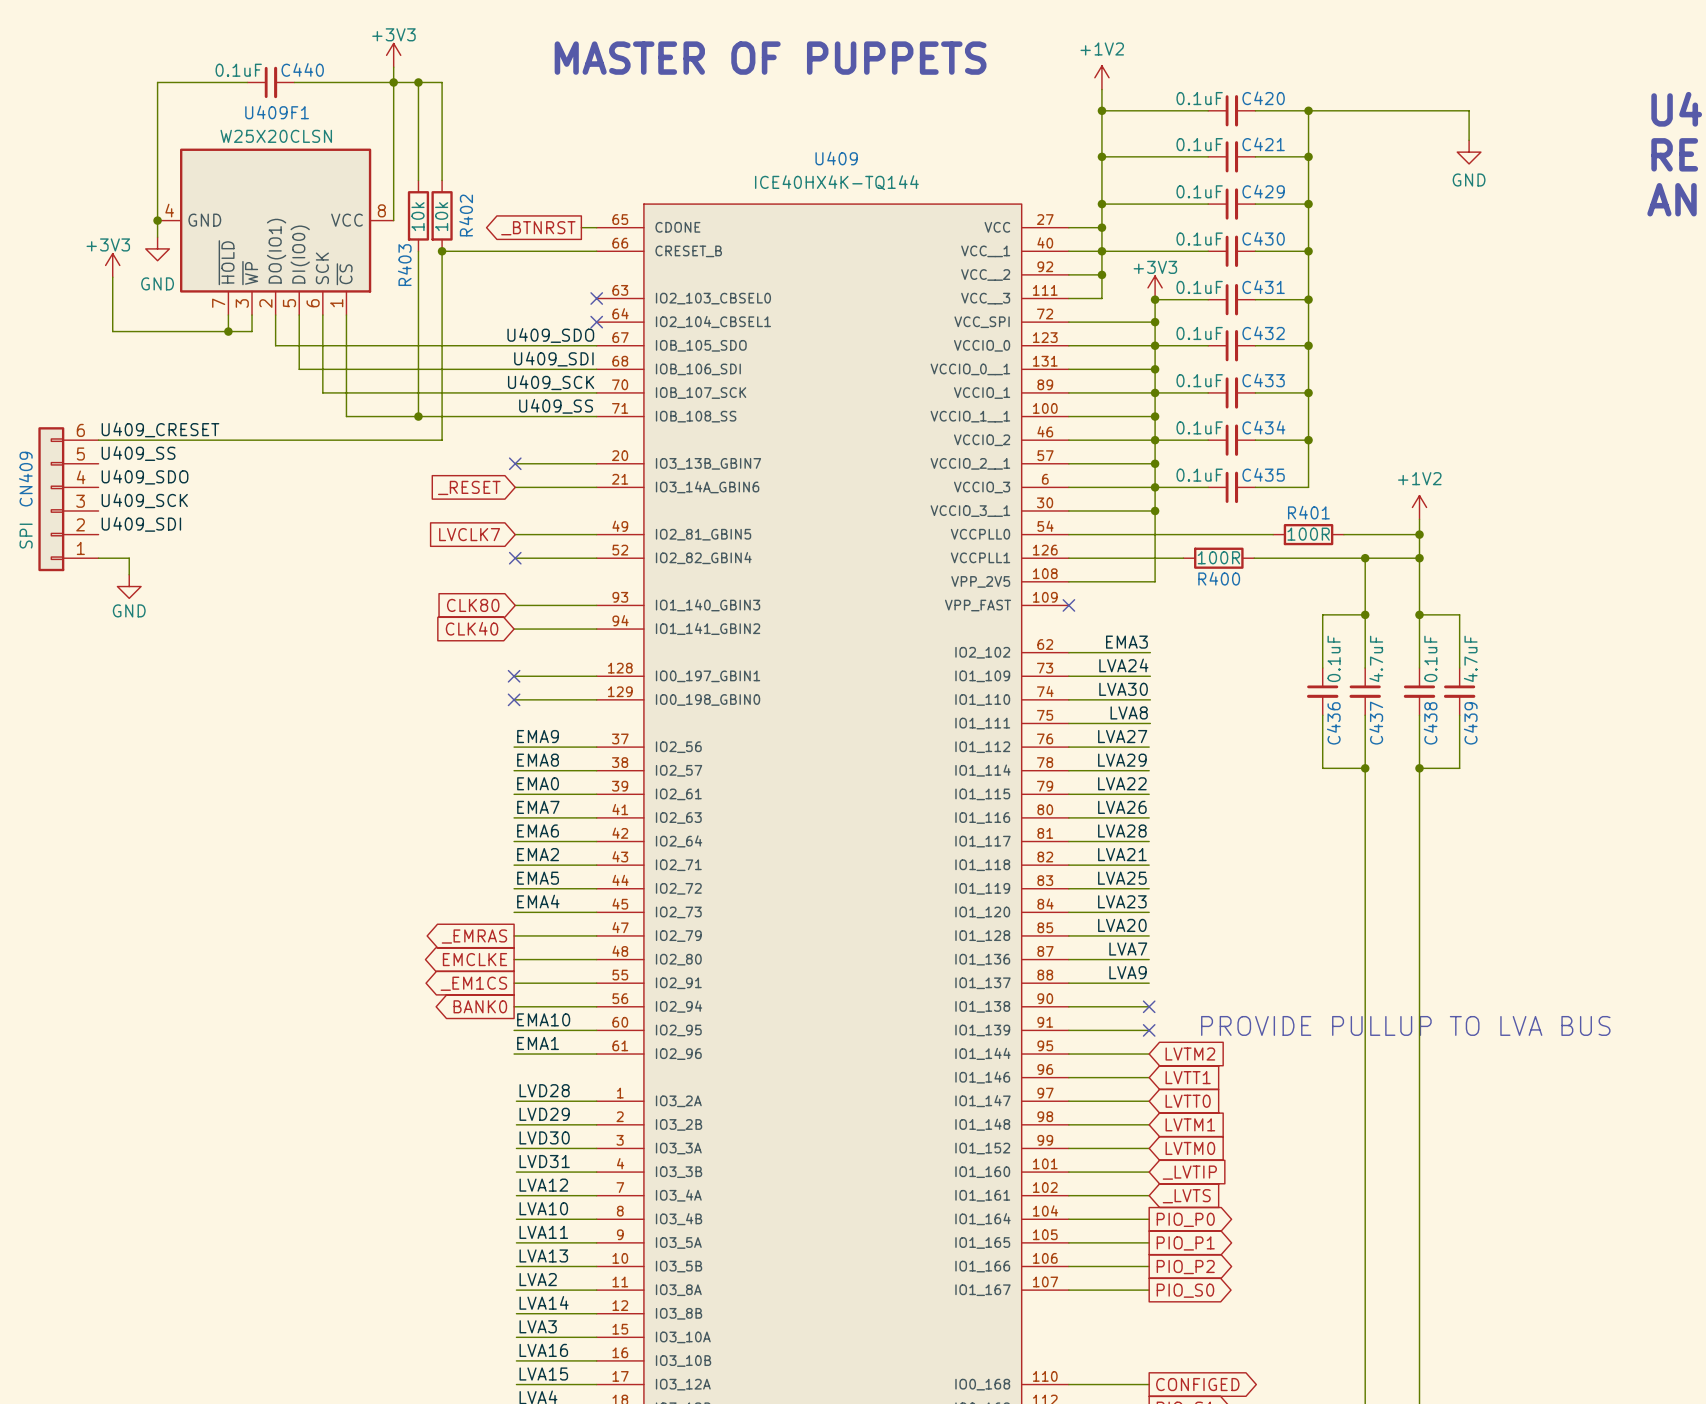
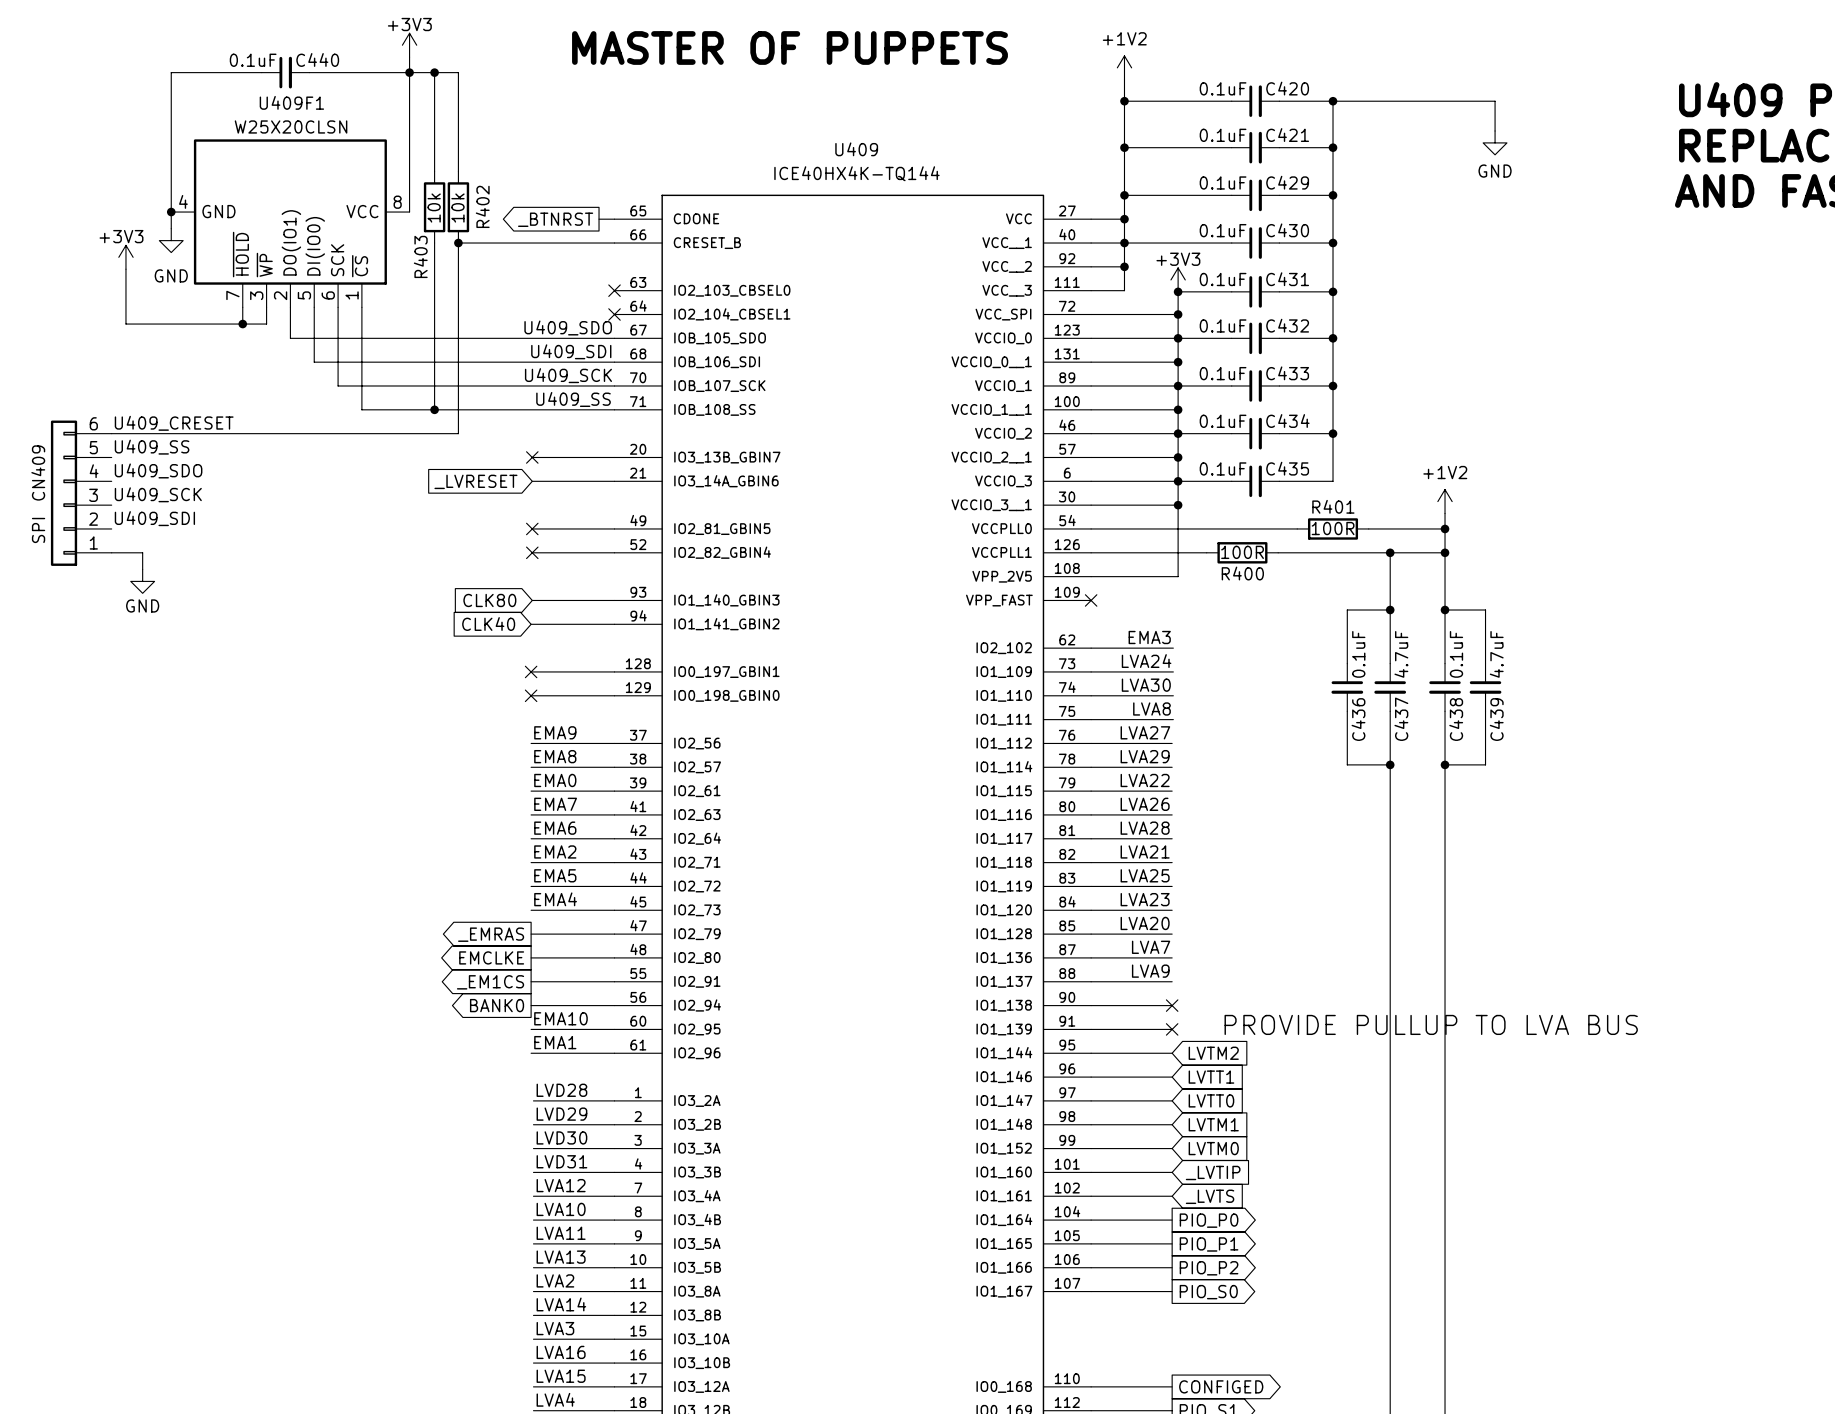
global label: _RESET (469, 487) -> _LVRESET (475, 481)
global label: LVCLK7 (469, 534) -> none
no-connect mark: none -> (532, 528)

